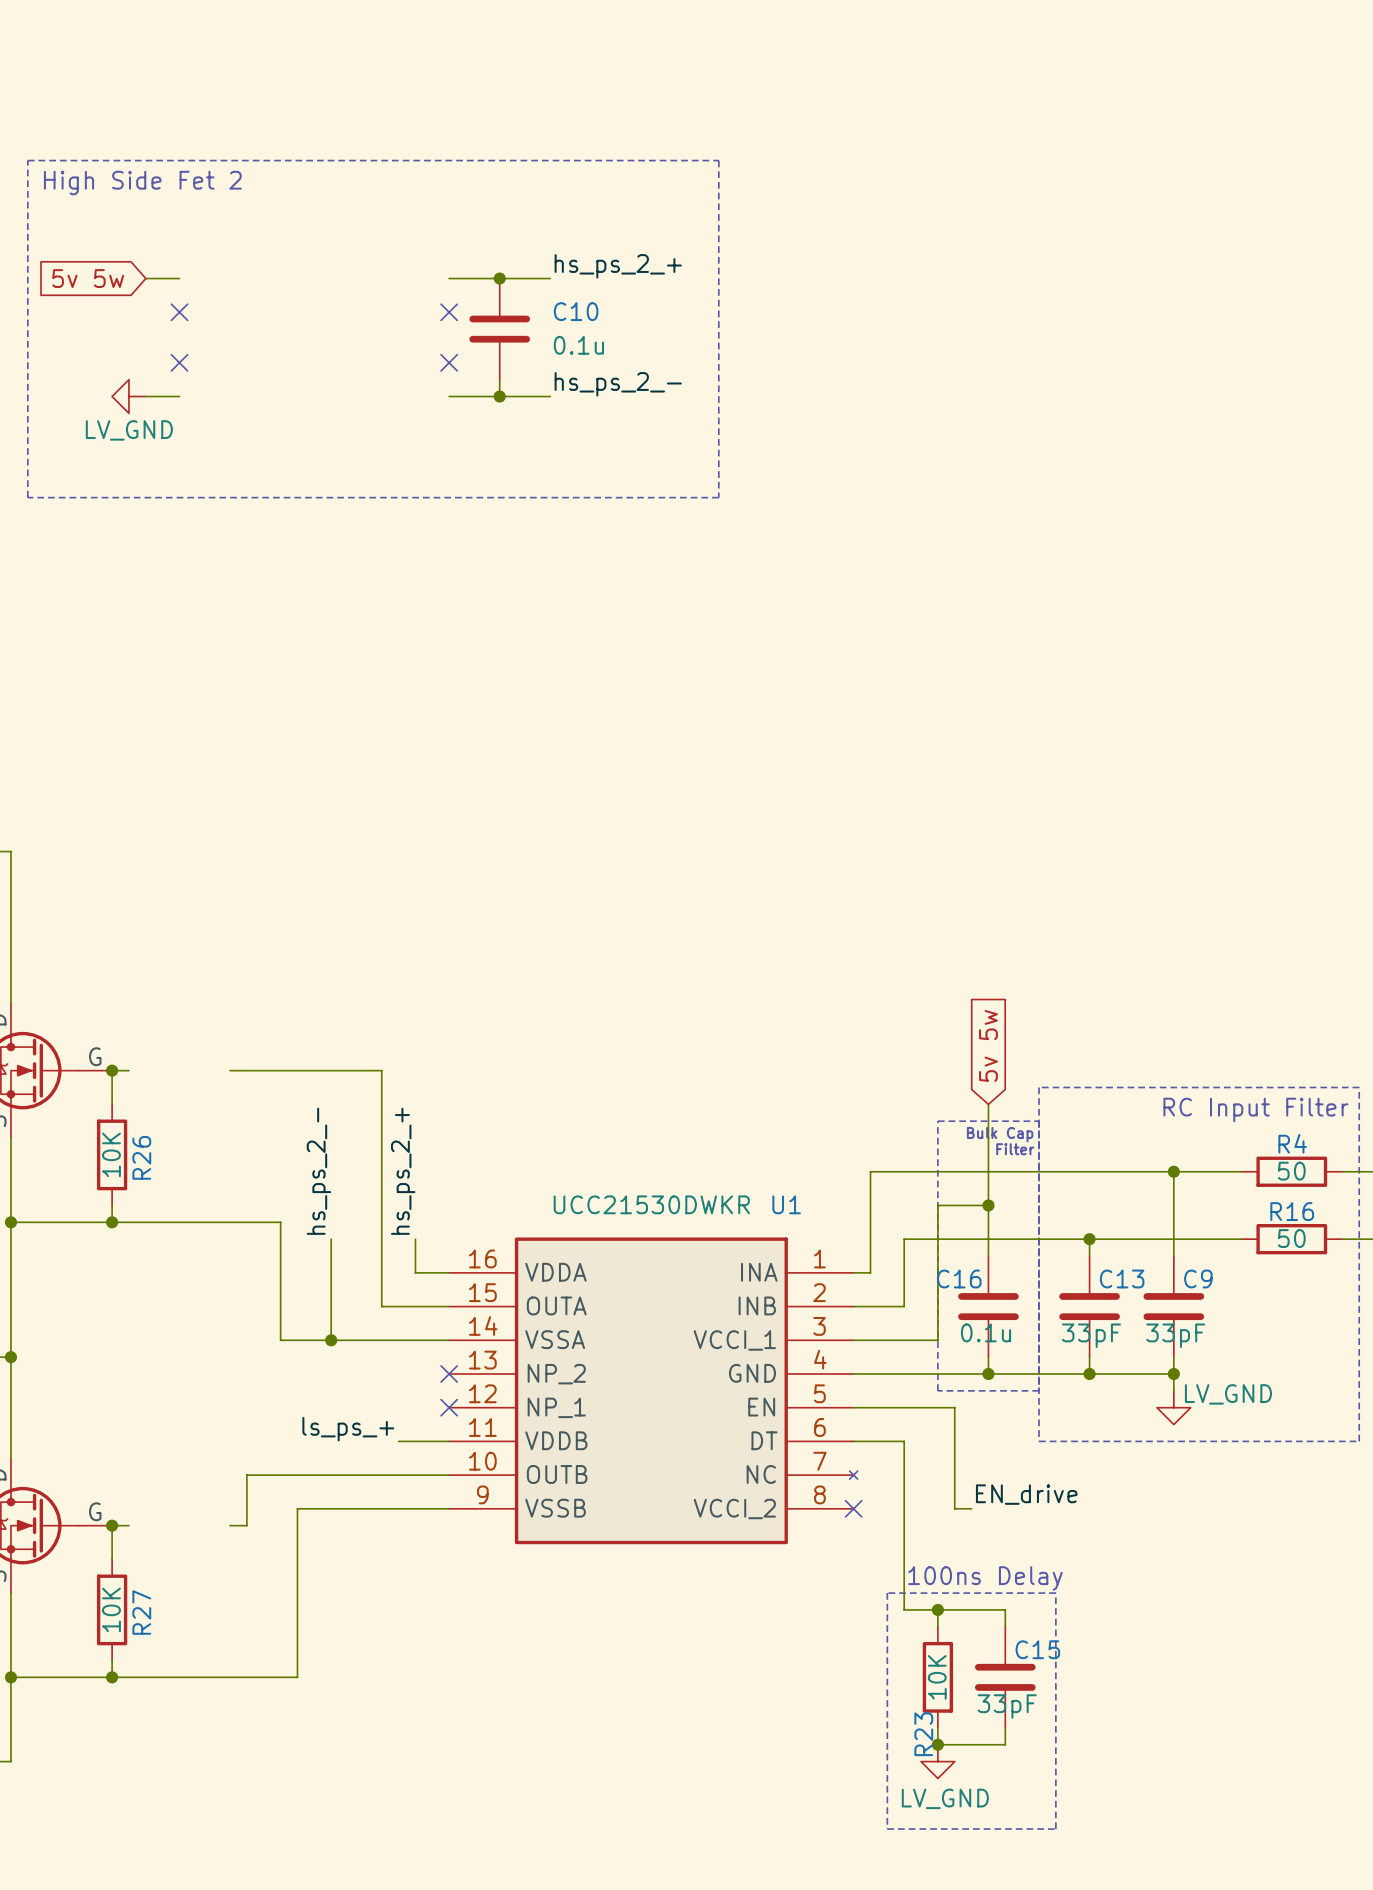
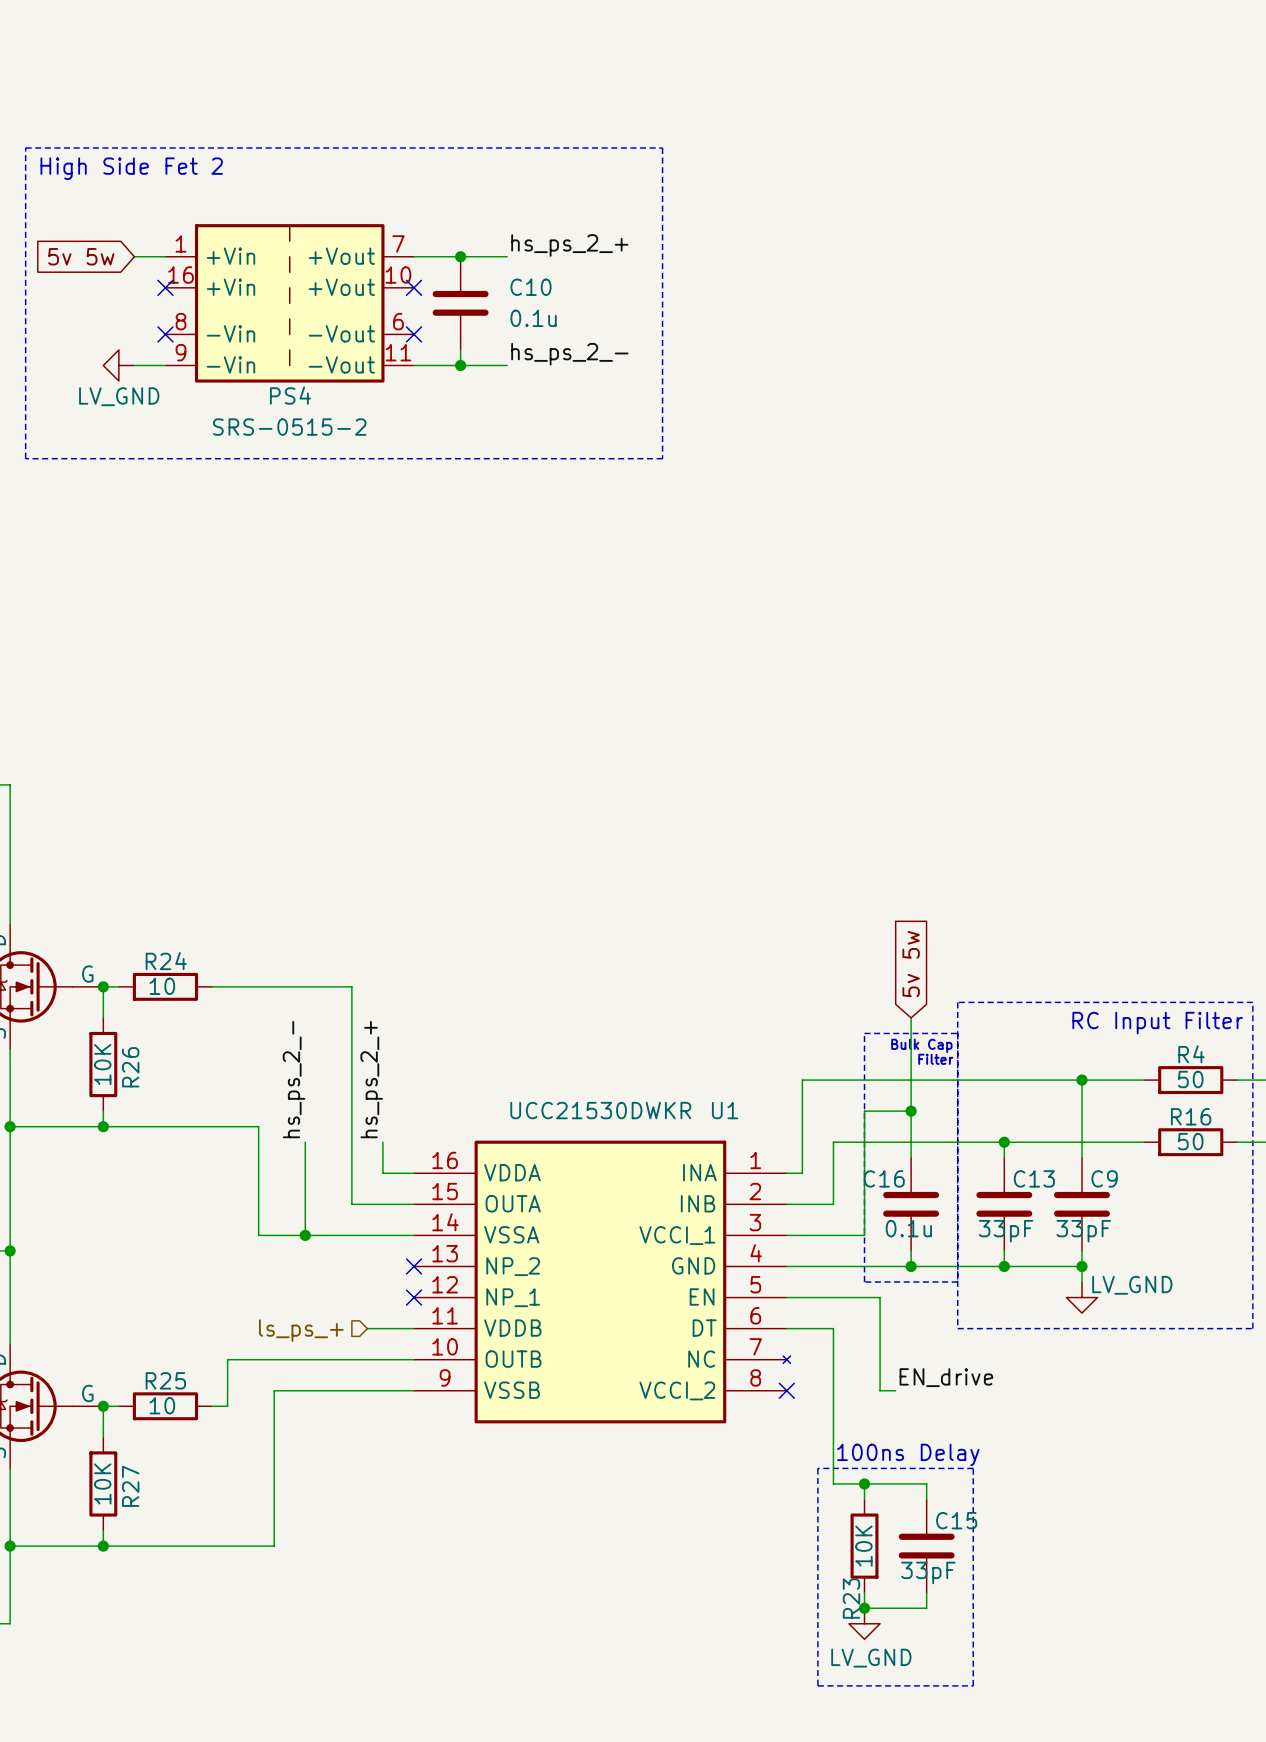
PS4: none -> SRS-0515-2 (289, 303)
R24: none -> 10 (165, 986)
label: ls_ps_+ (348, 1429) -> none
hierarchical label: none -> ls_ps_+ (301, 1330)
R25: none -> 10 (165, 1406)

